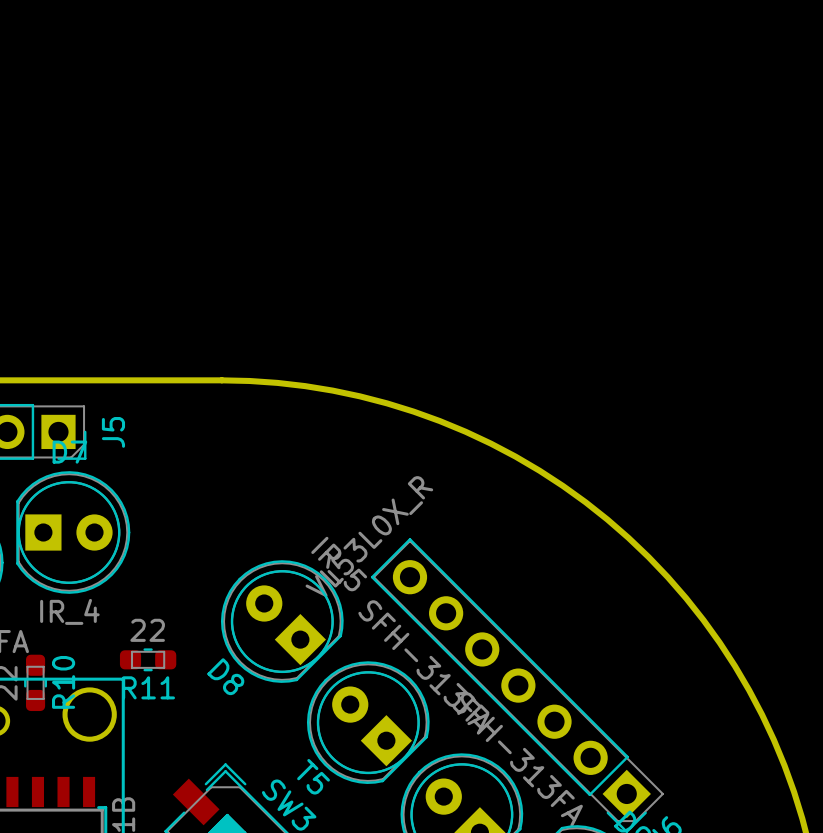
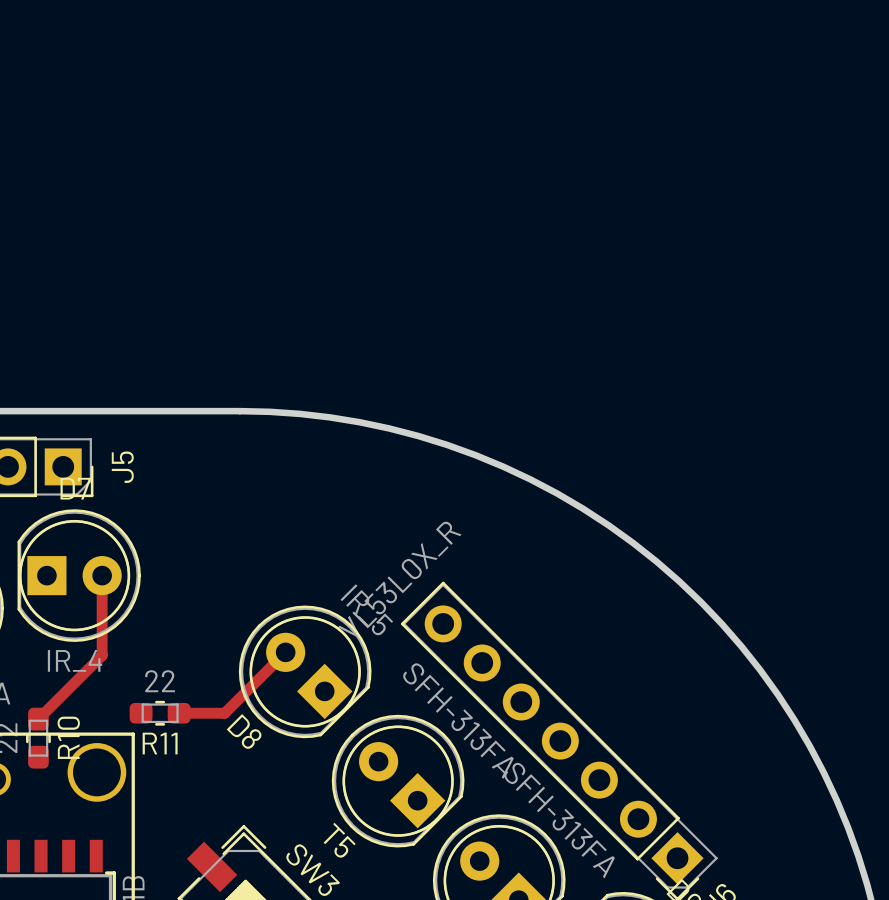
track: none -> (102, 575) (102, 655) (38, 719)
track: none -> (285, 652) (224, 713) (179, 713)

